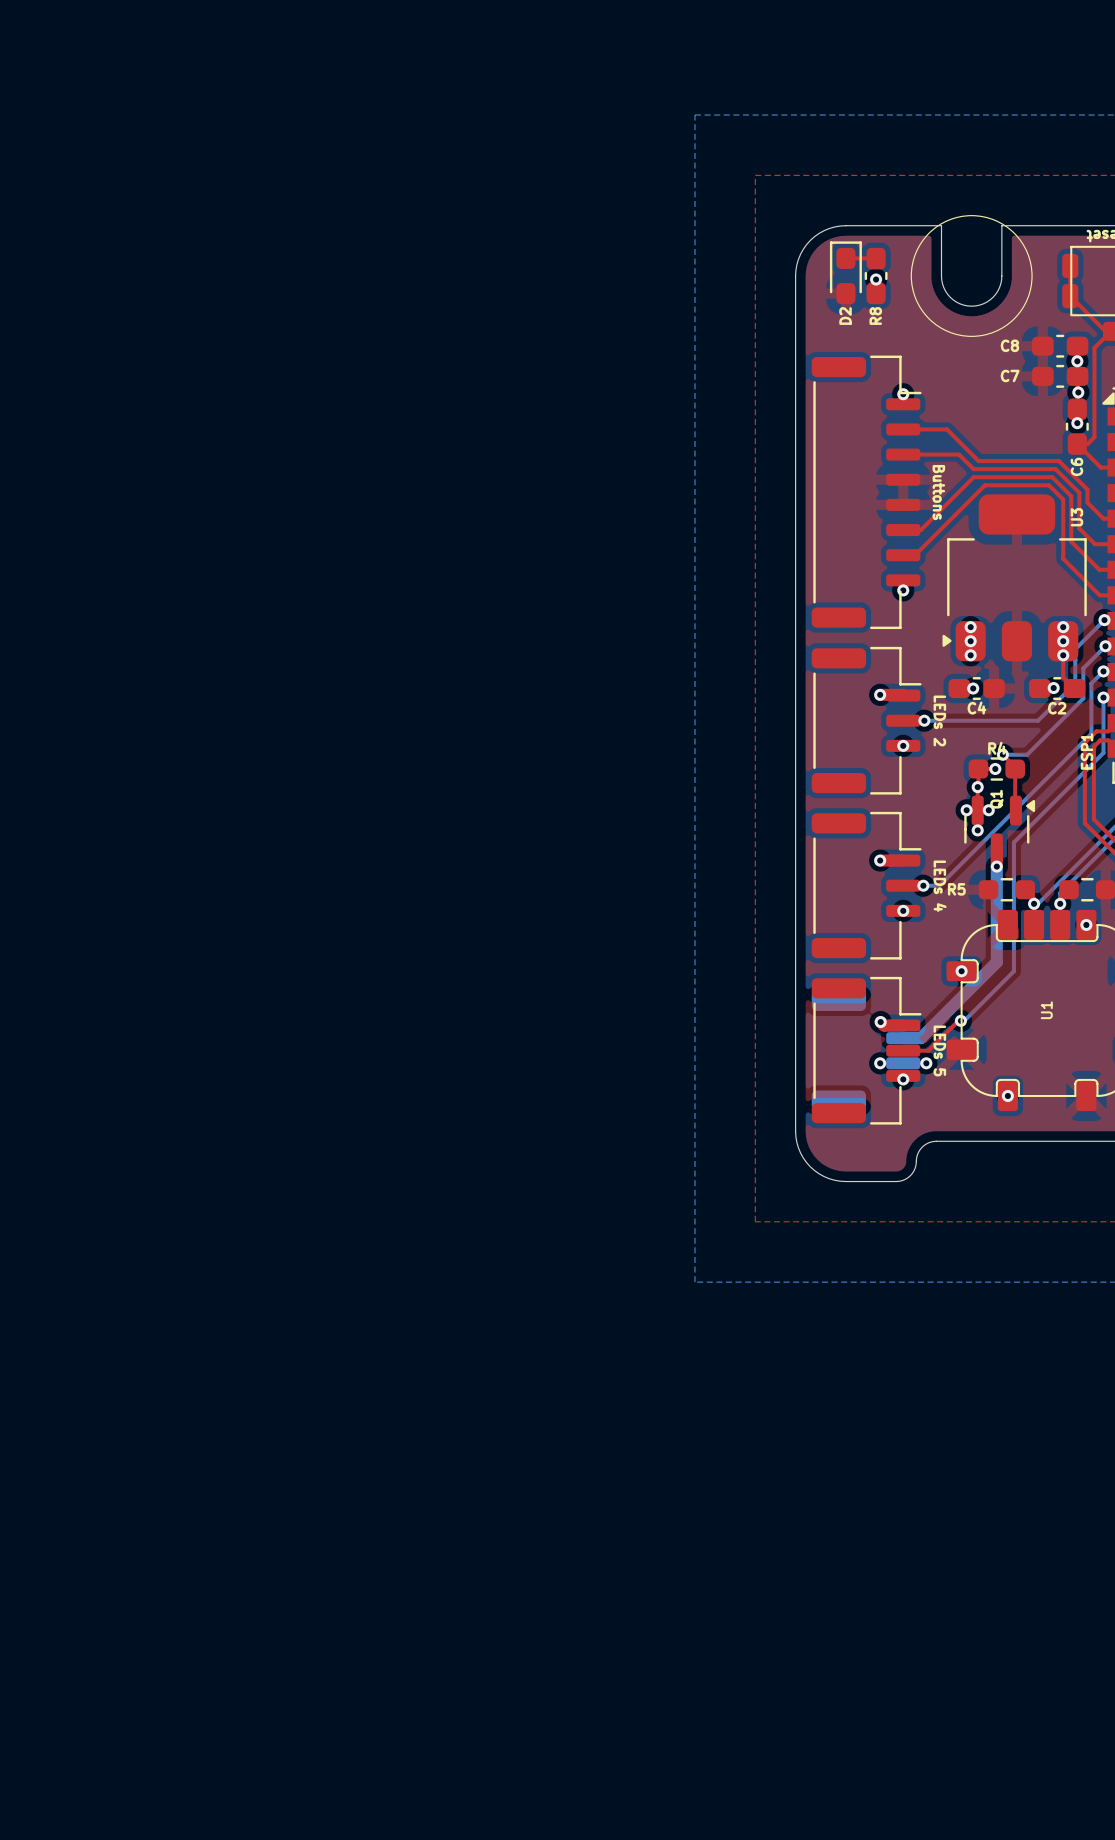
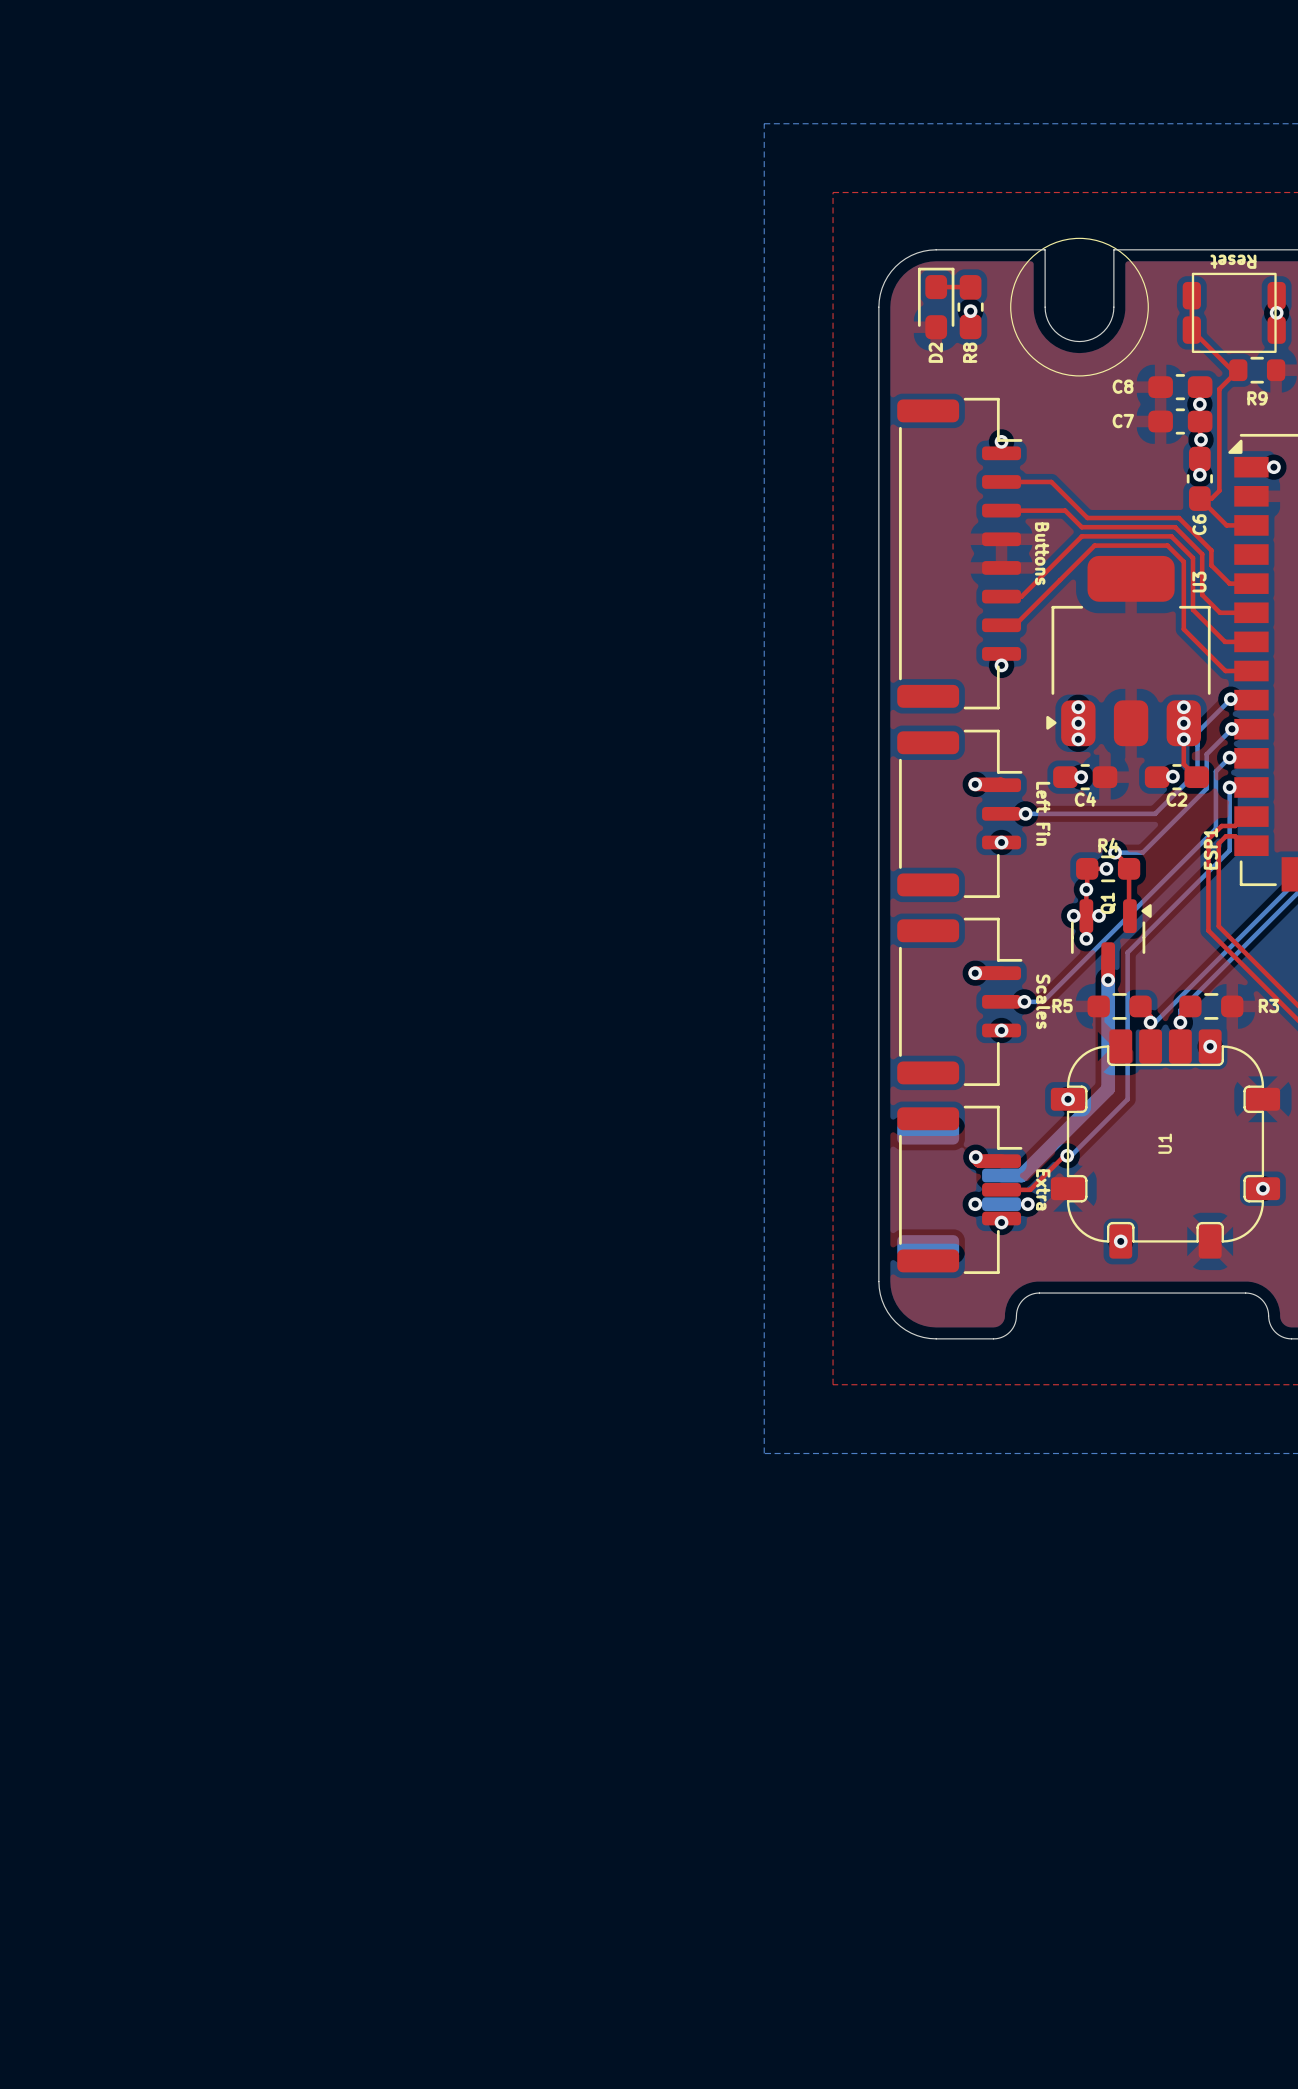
part value: LEDs 2 (939, 720) -> Left Fin (1043, 813)
part value: LEDs 4 (940, 886) -> Scales (1043, 1001)
part value: LEDs 5 (939, 1050) -> Extra (1043, 1189)

